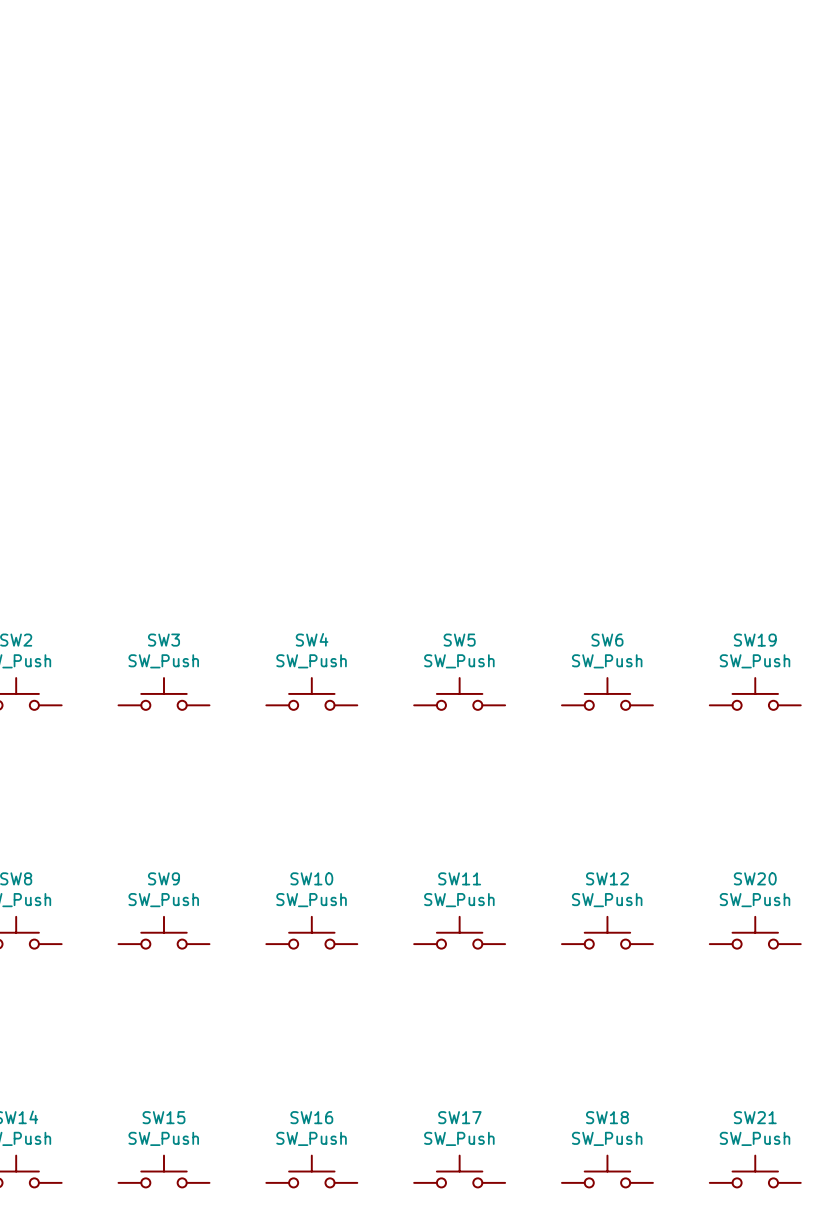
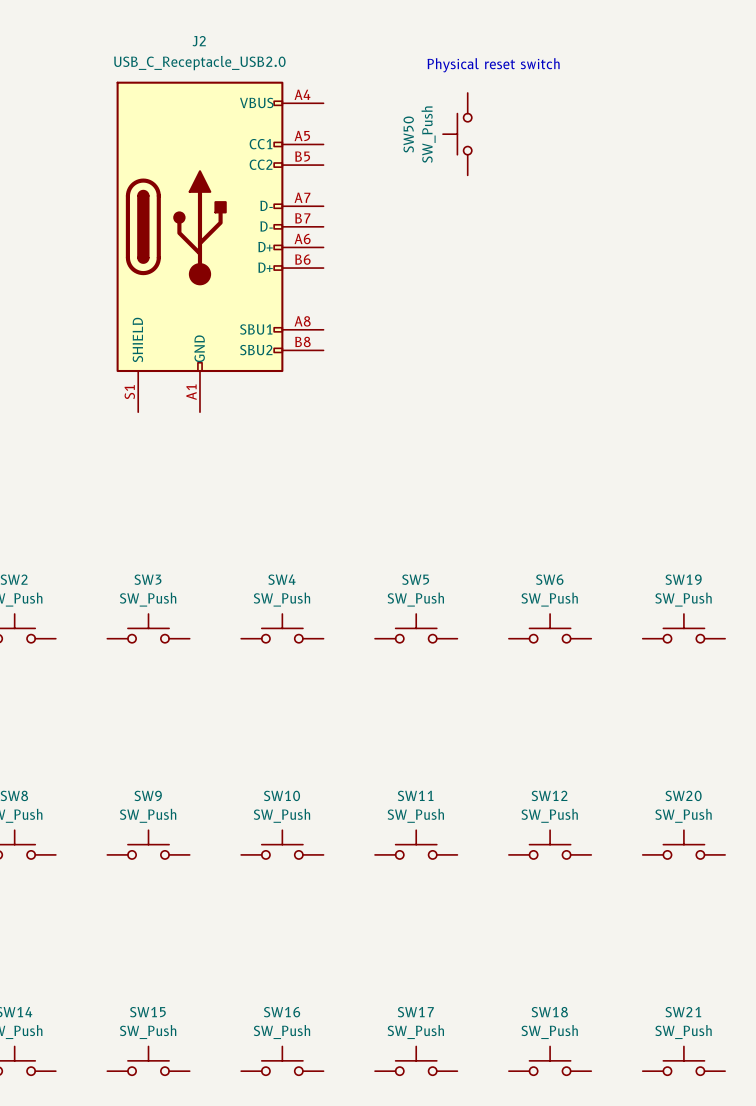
text: none -> Physical reset switch (493, 65)
SW50: none -> SW_Push (457, 134)
J2: none -> USB_C_Receptacle_USB2.0 (220, 246)

